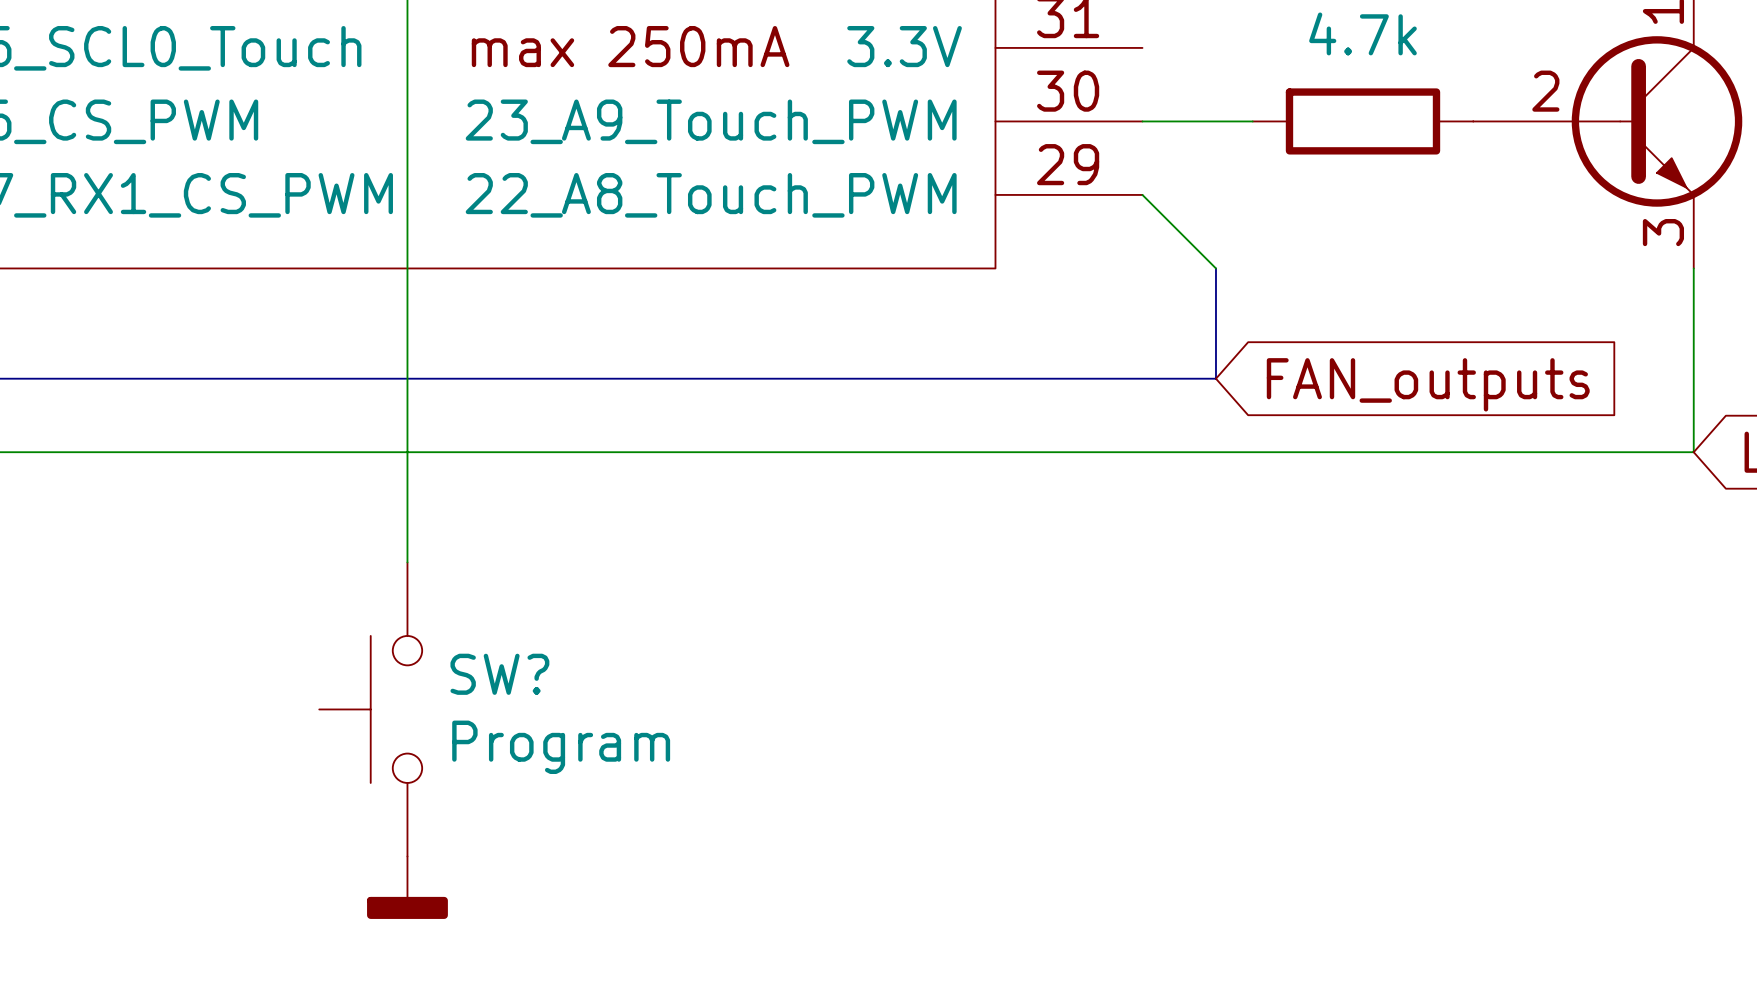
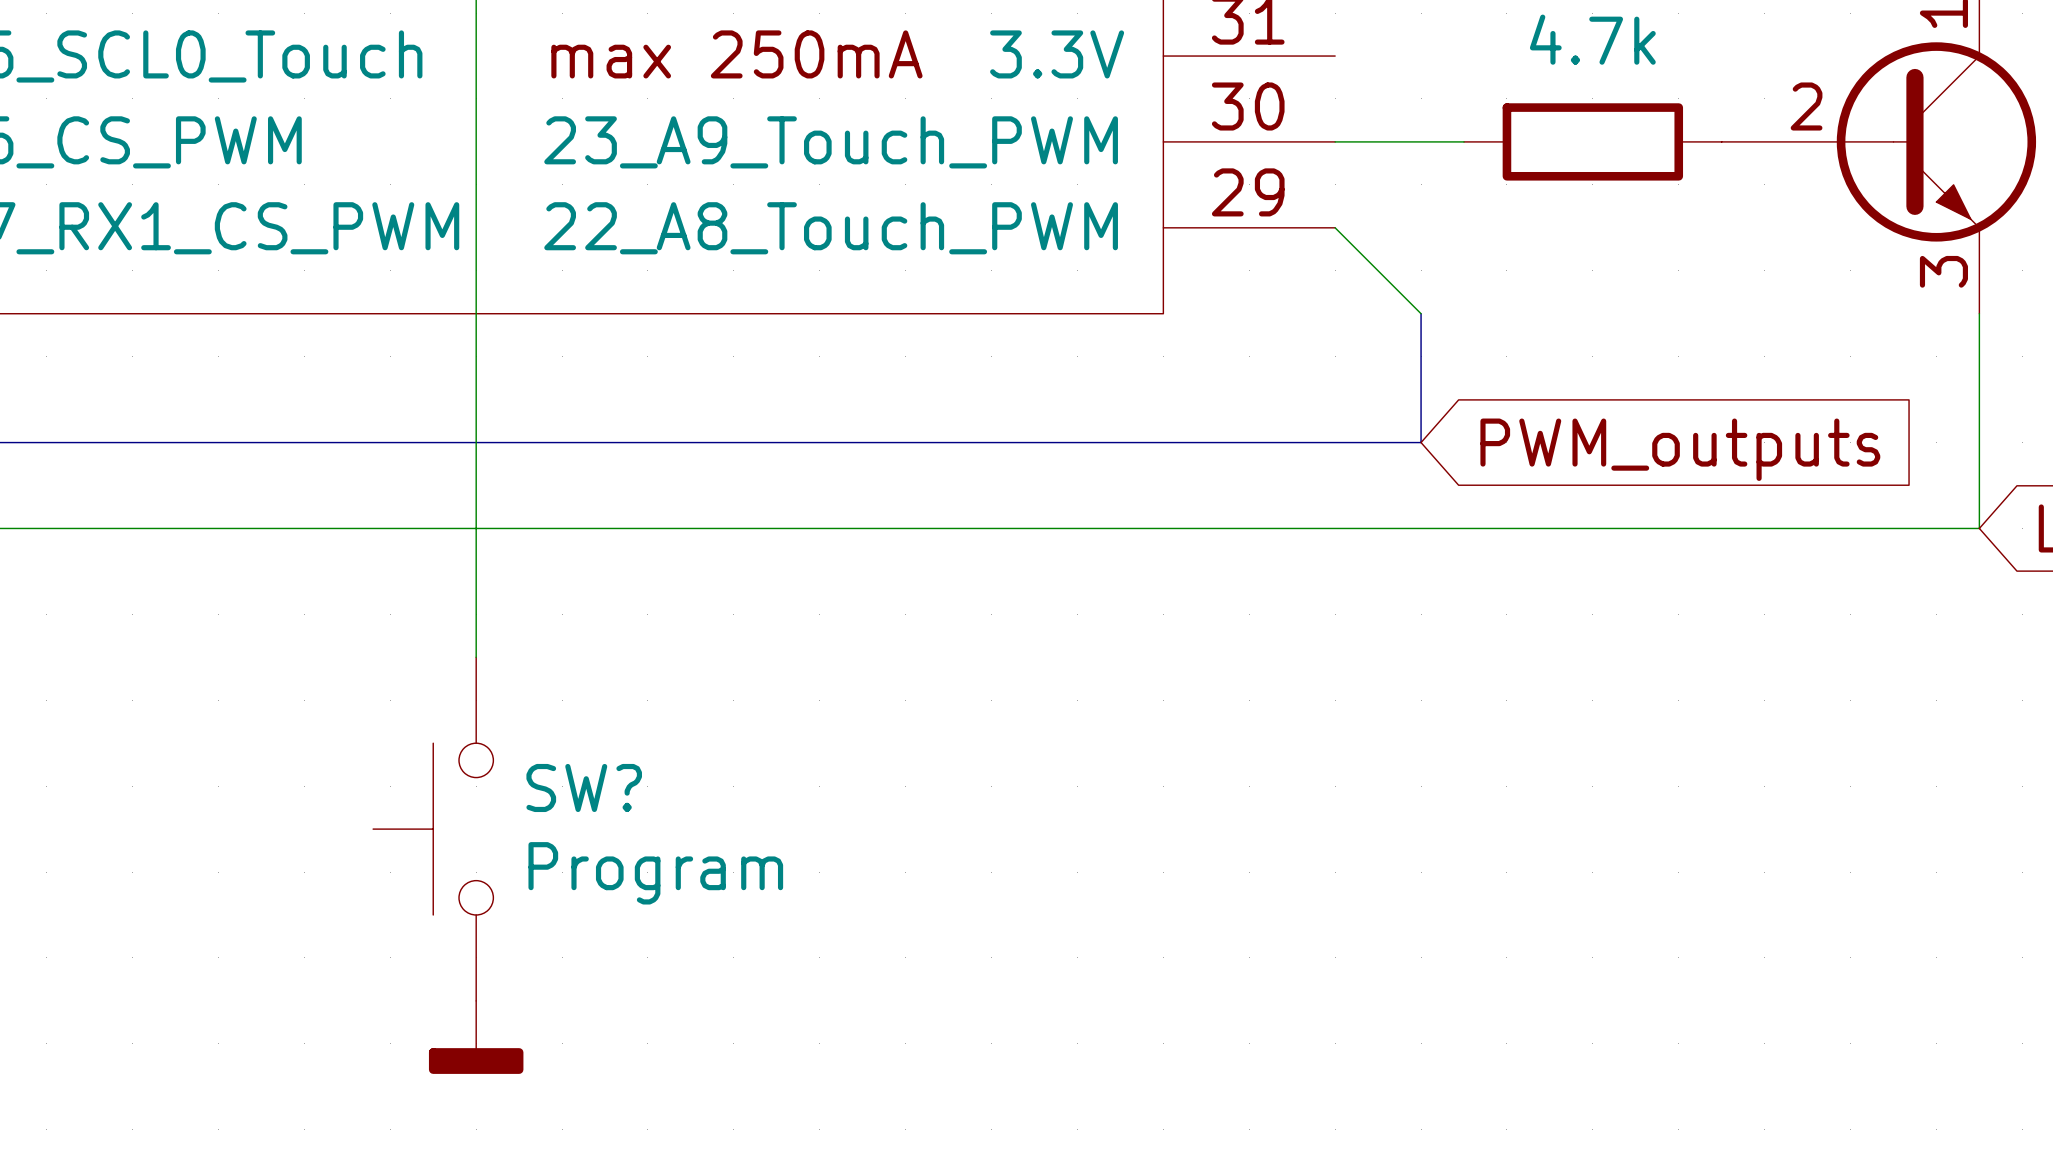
global label: FAN_outputs (1428, 384) -> PWM_outputs (1680, 449)

